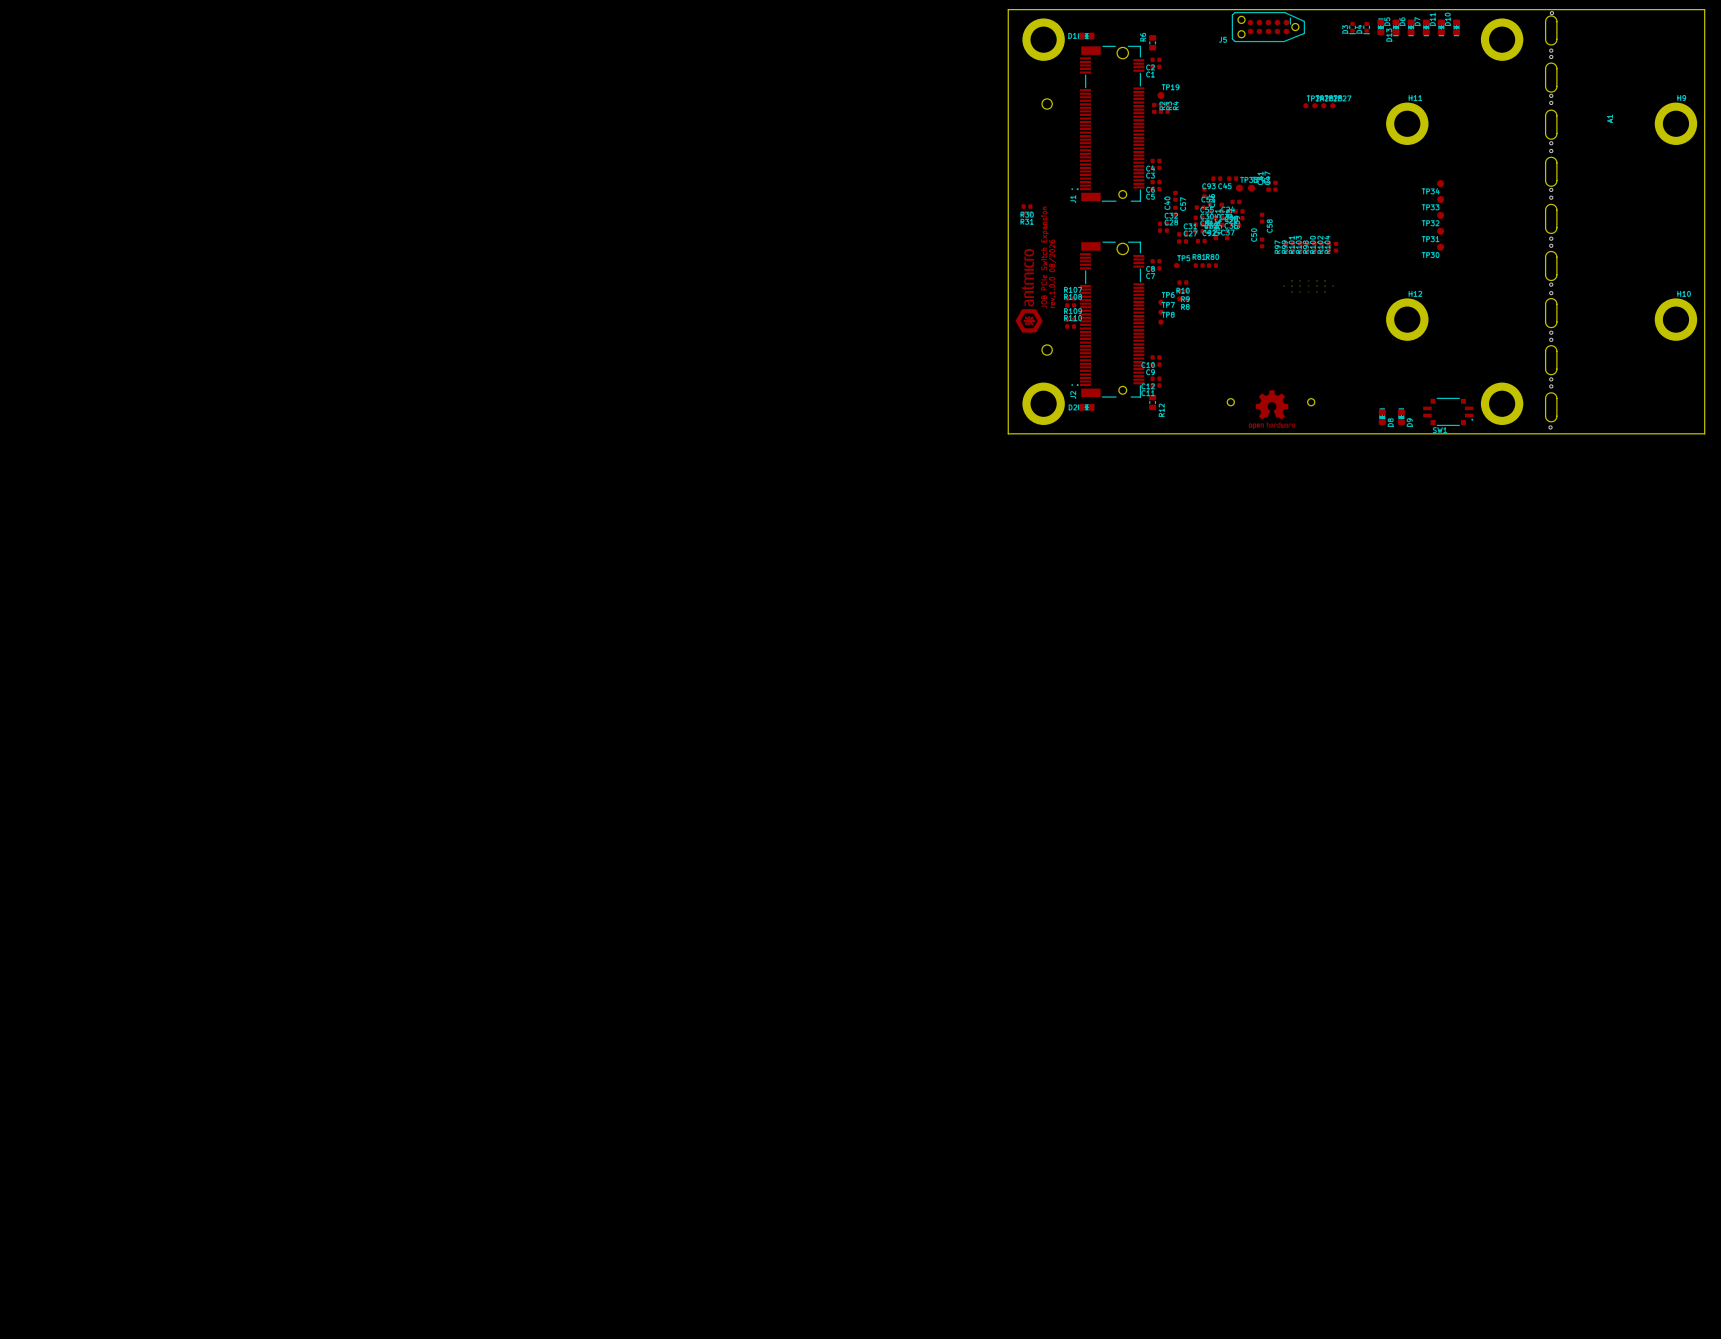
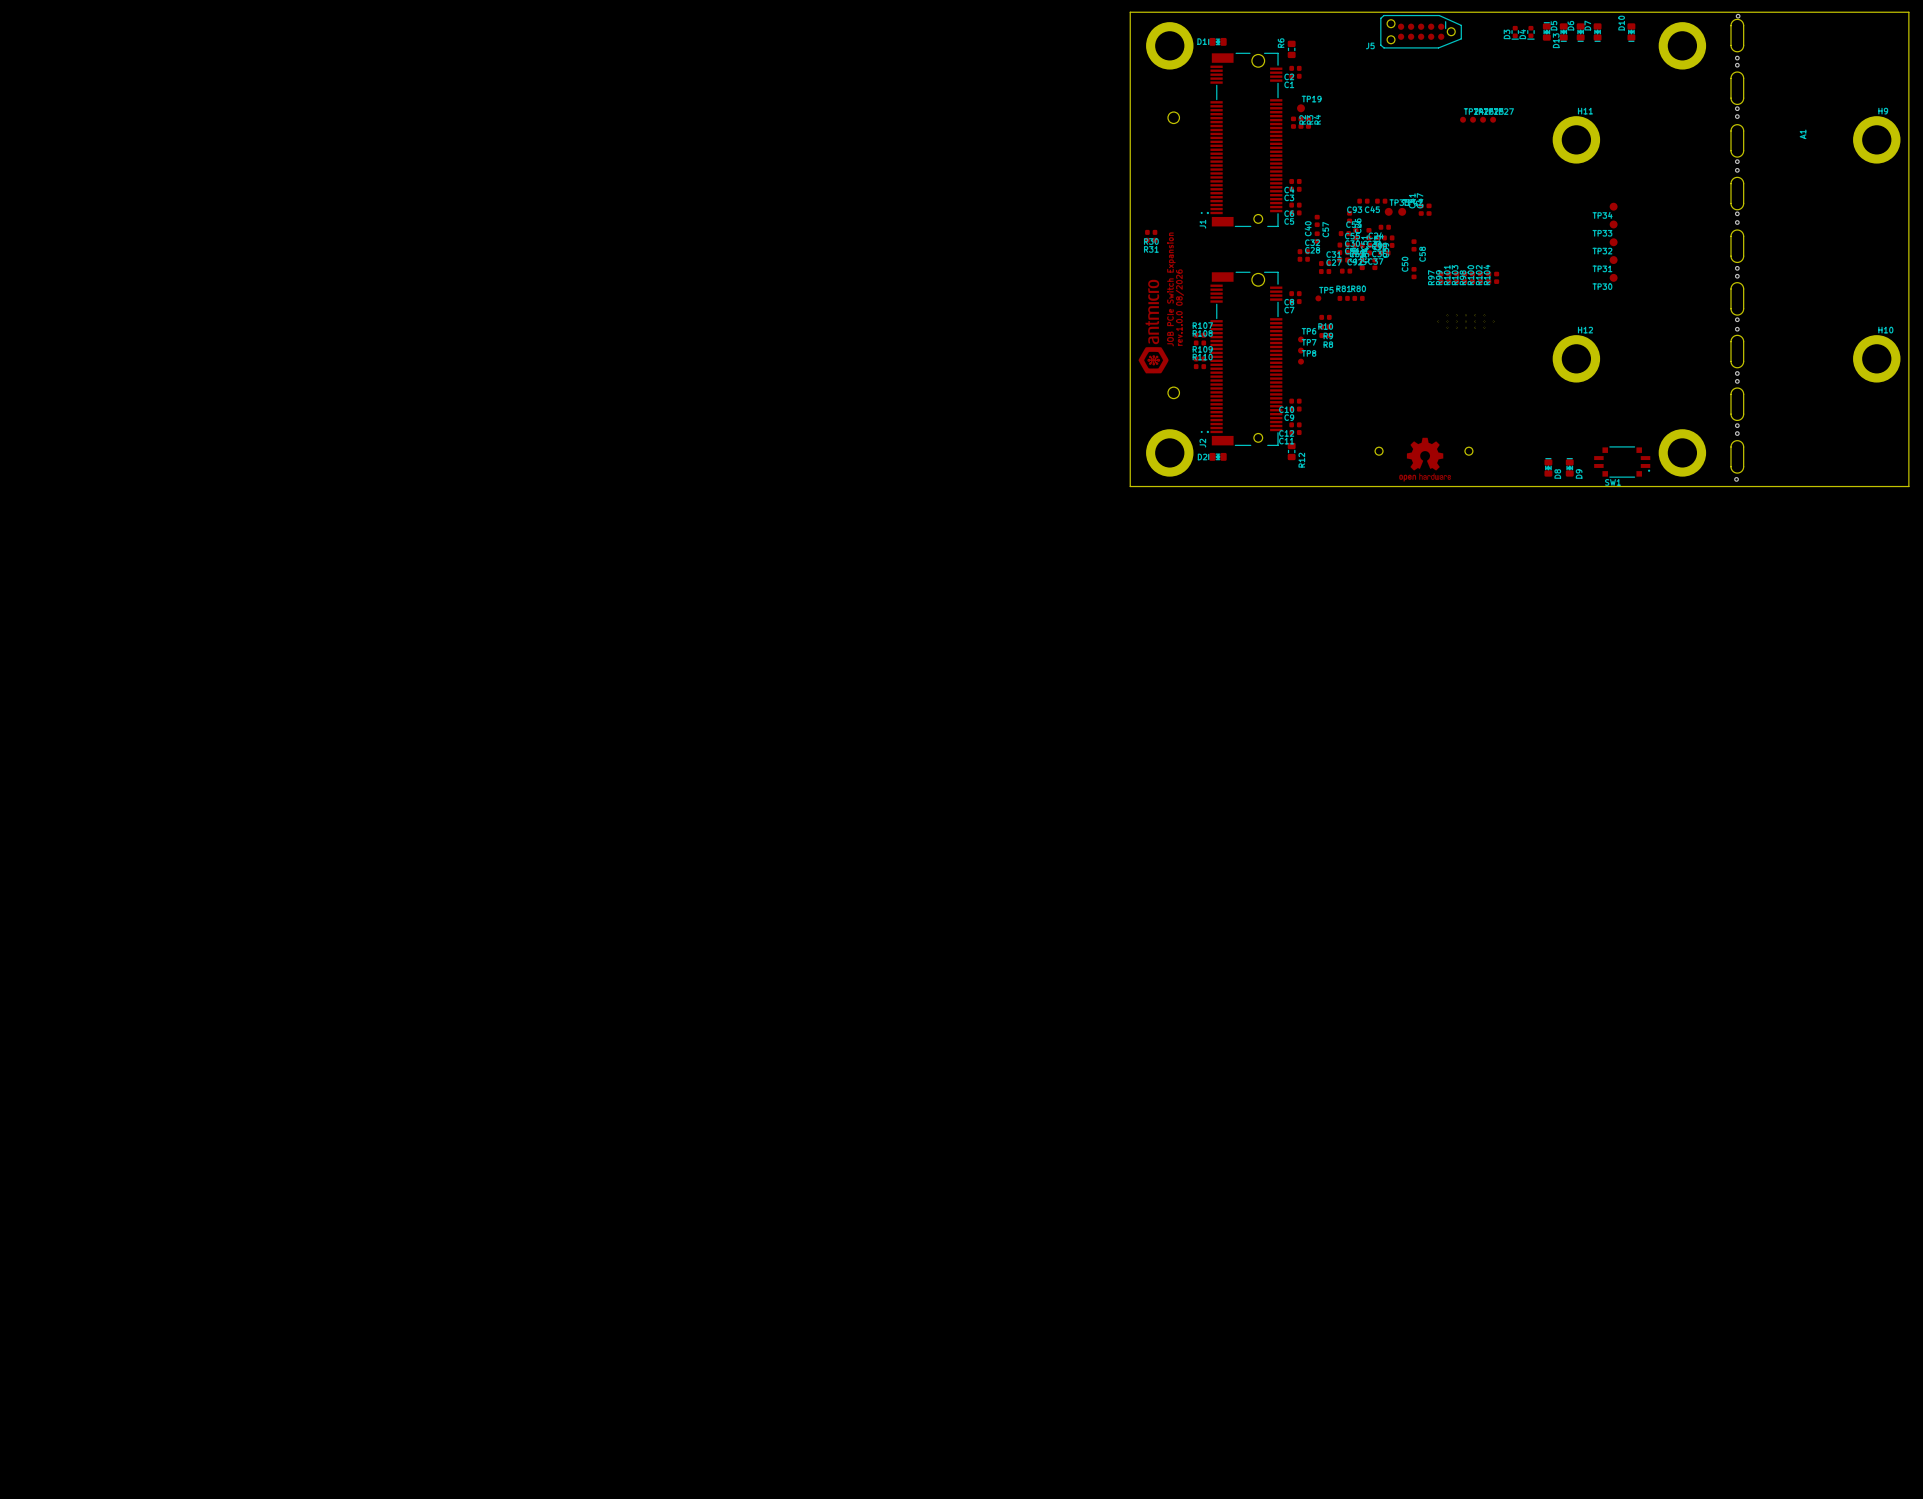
part: (1441, 27) -> none

